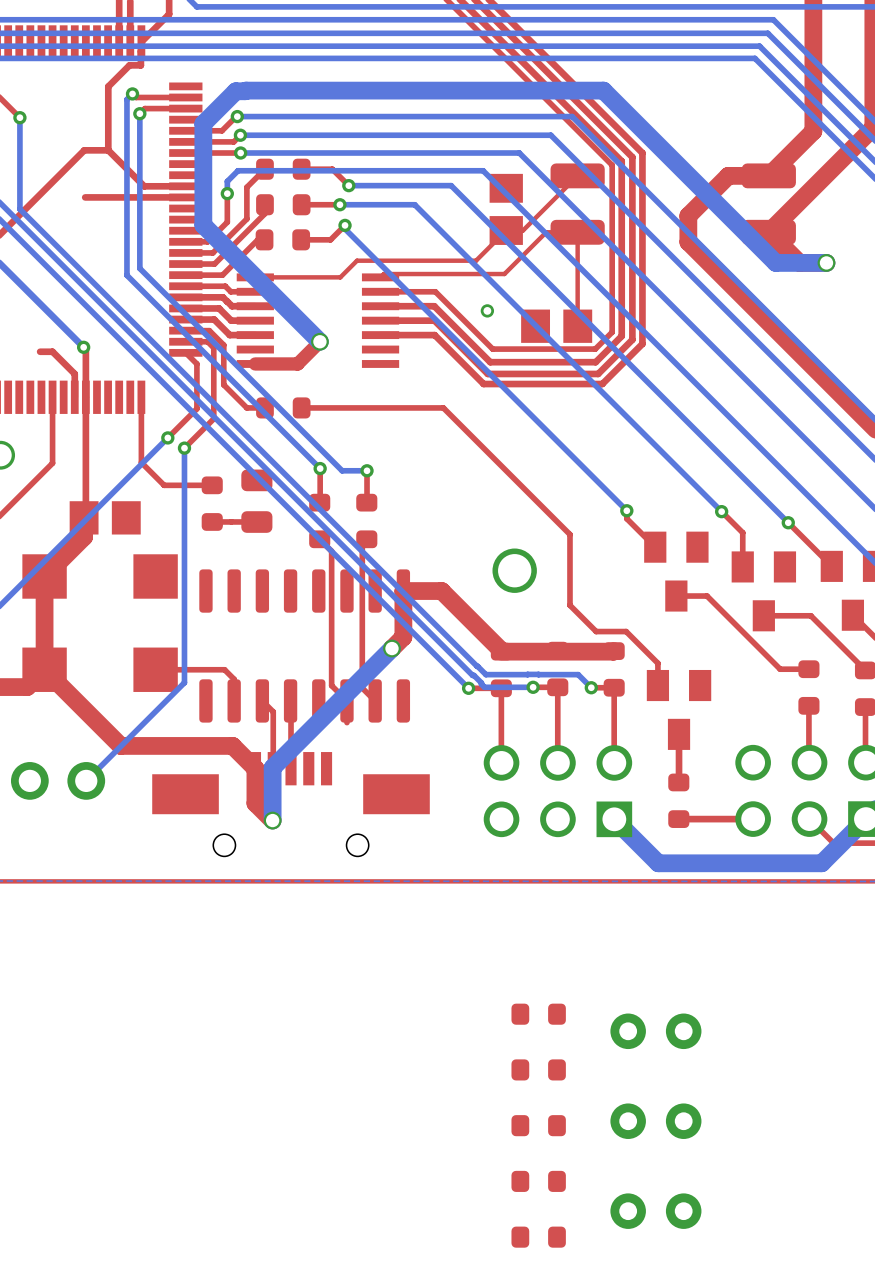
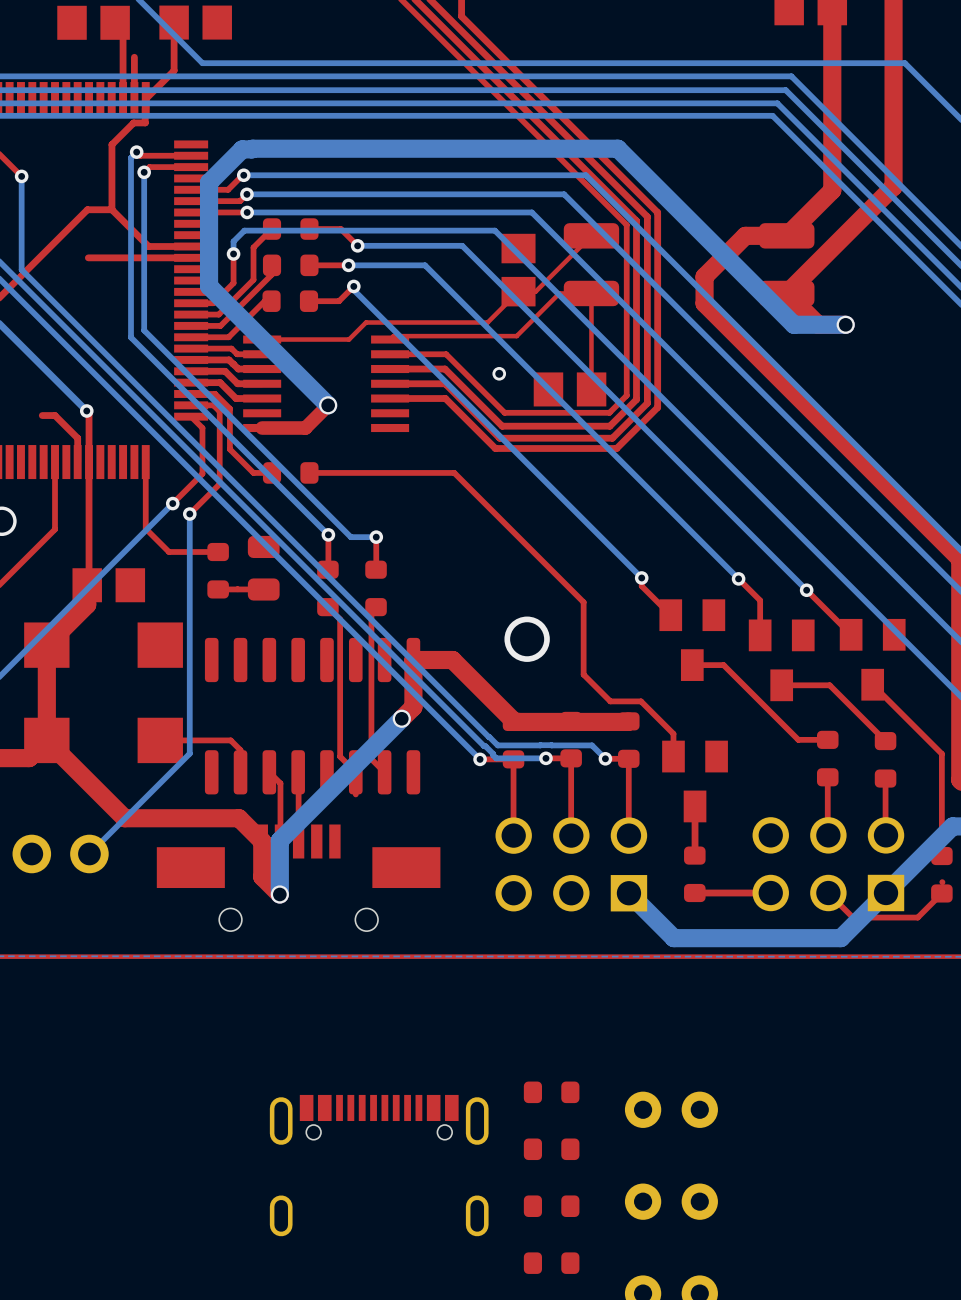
part: none -> (379, 1165)

